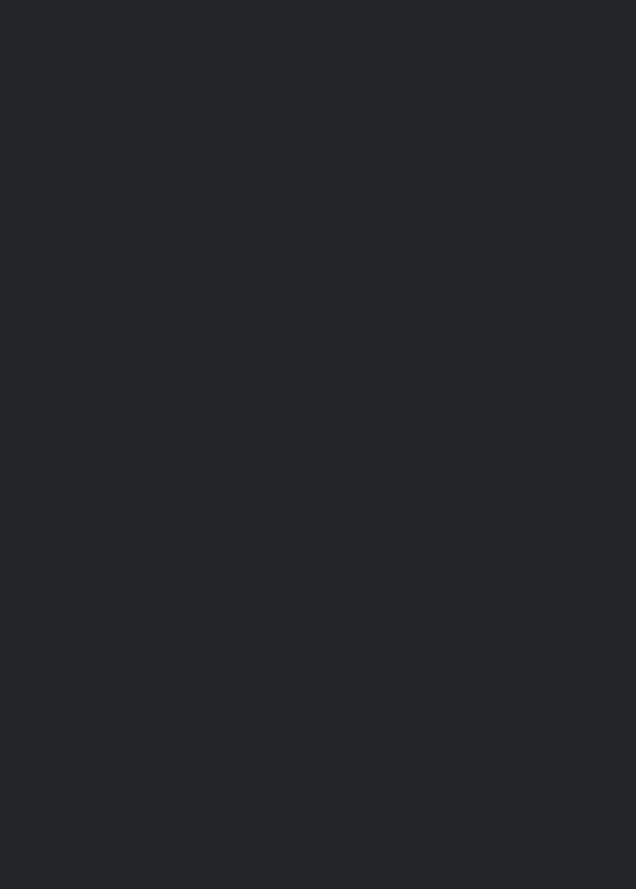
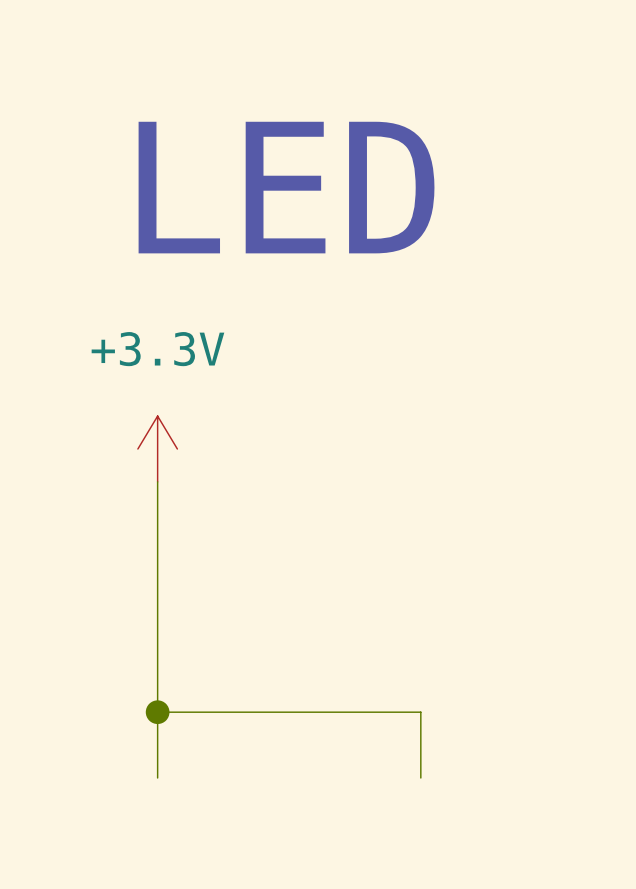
text: none -> LED (286, 187)
power symbol: none -> +3.3V (157, 448)
wire: none -> (157, 481) (157, 777)
wire: none -> (157, 712) (420, 712) (420, 777)
junction: none -> (157, 712)

